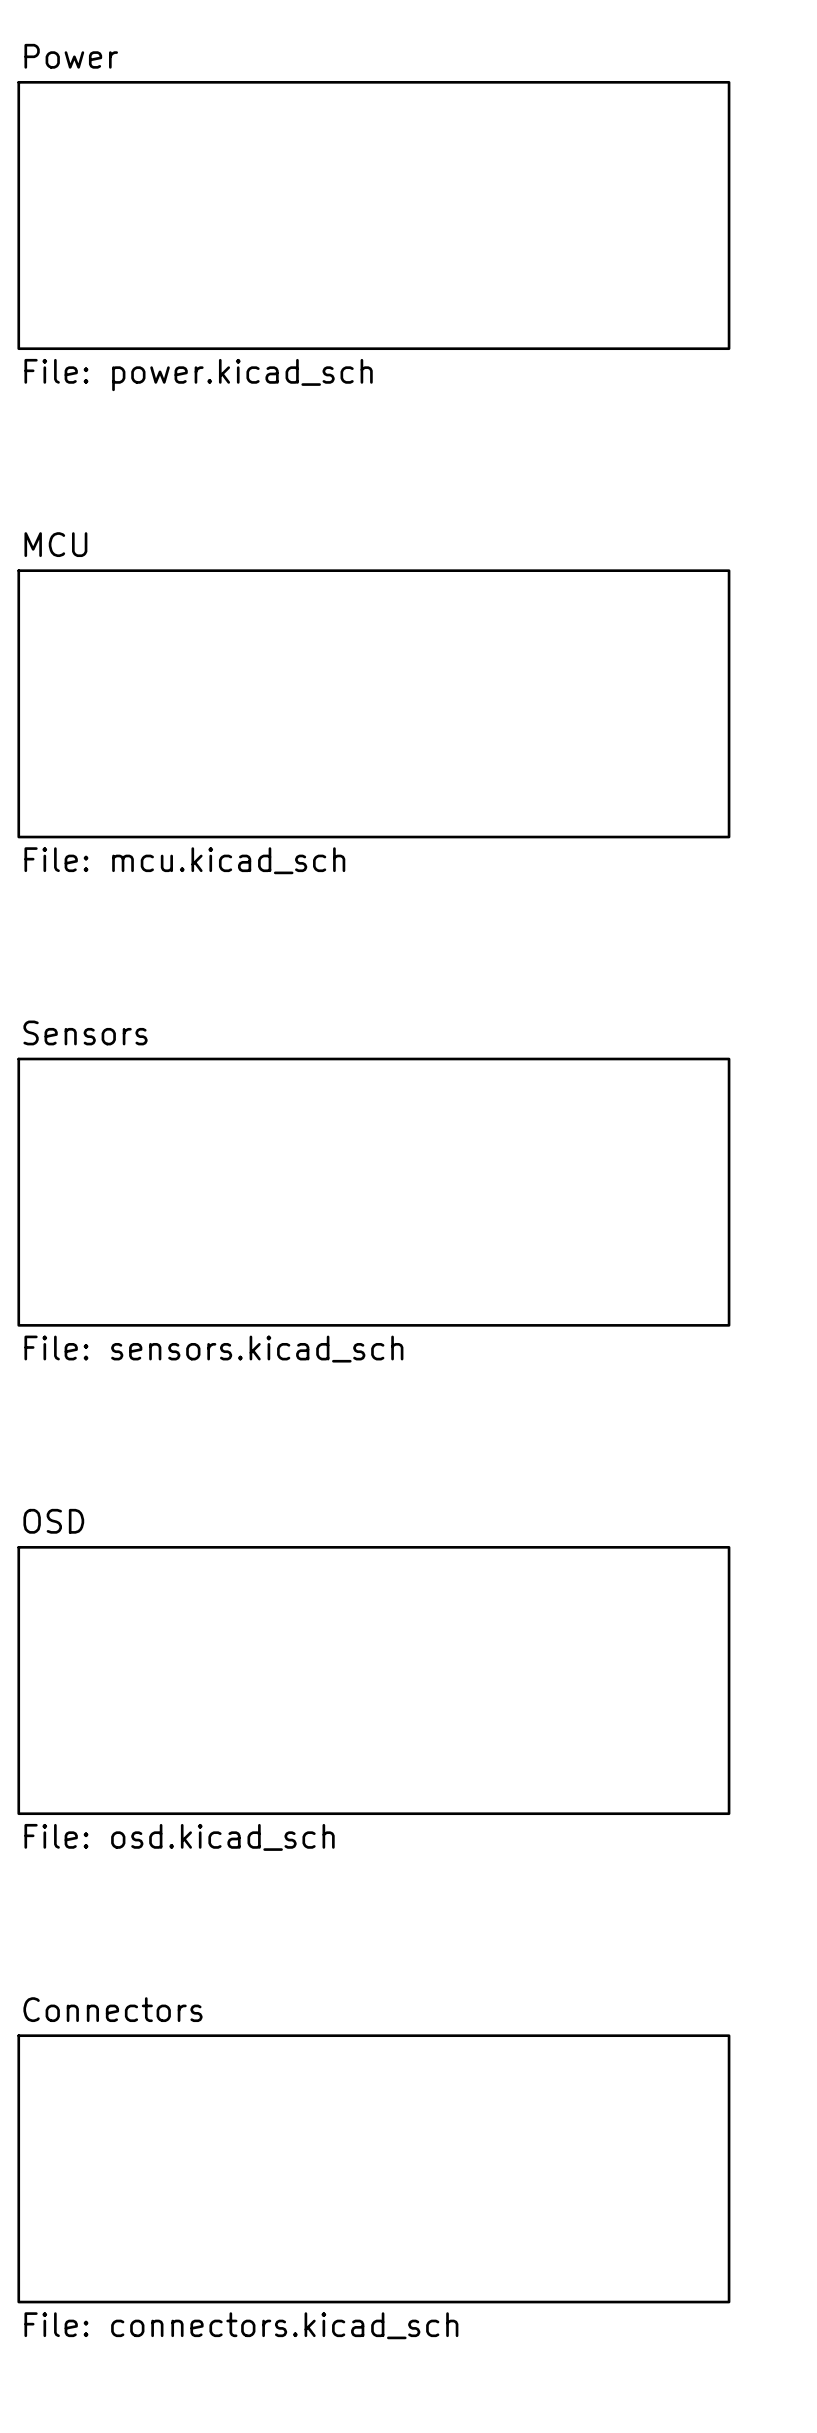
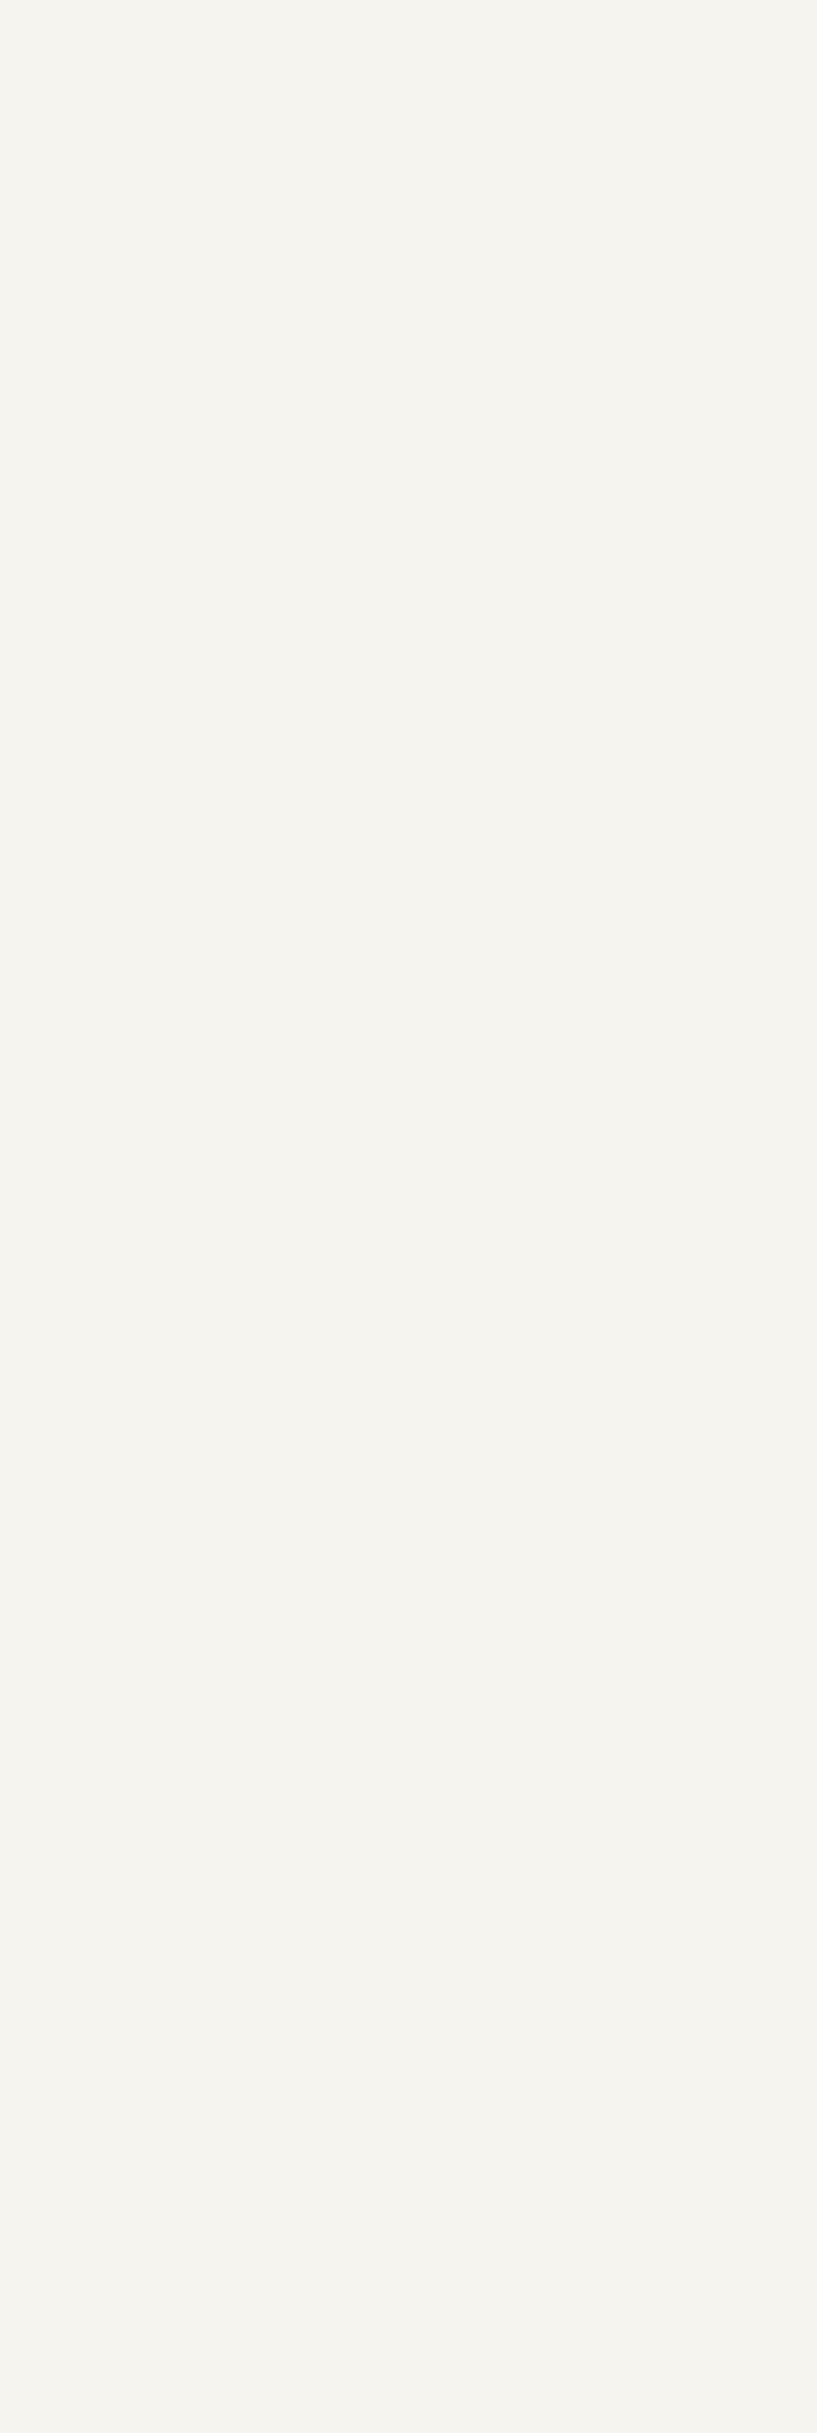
sheet Power: File: power.kicad_sch (373, 215) -> none
sheet MCU: File: mcu.kicad_sch (373, 703) -> none
sheet Sensors: File: sensors.kicad_sch (373, 1192) -> none
sheet OSD: File: osd.kicad_sch (373, 1680) -> none
sheet Connectors: File: connectors.kicad_sch (373, 2168) -> none

